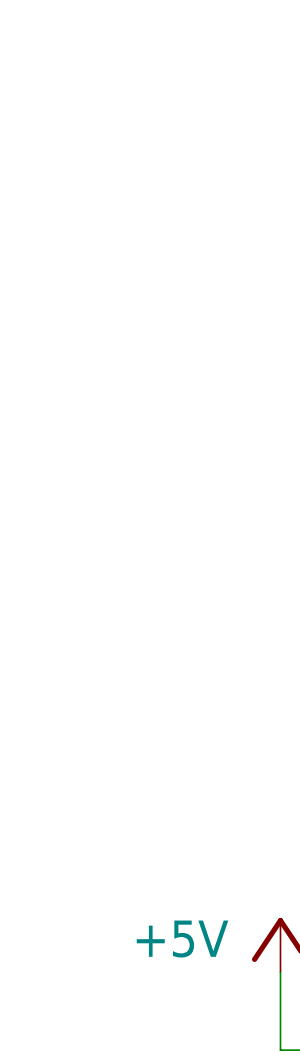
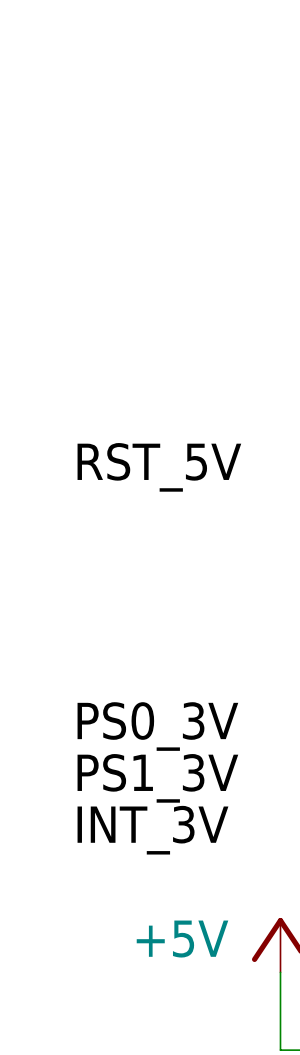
label: none -> RST_5V (159, 467)
label: none -> PS0_3V (157, 726)
label: none -> PS1_3V (157, 778)
label: none -> INT_3V (152, 830)

